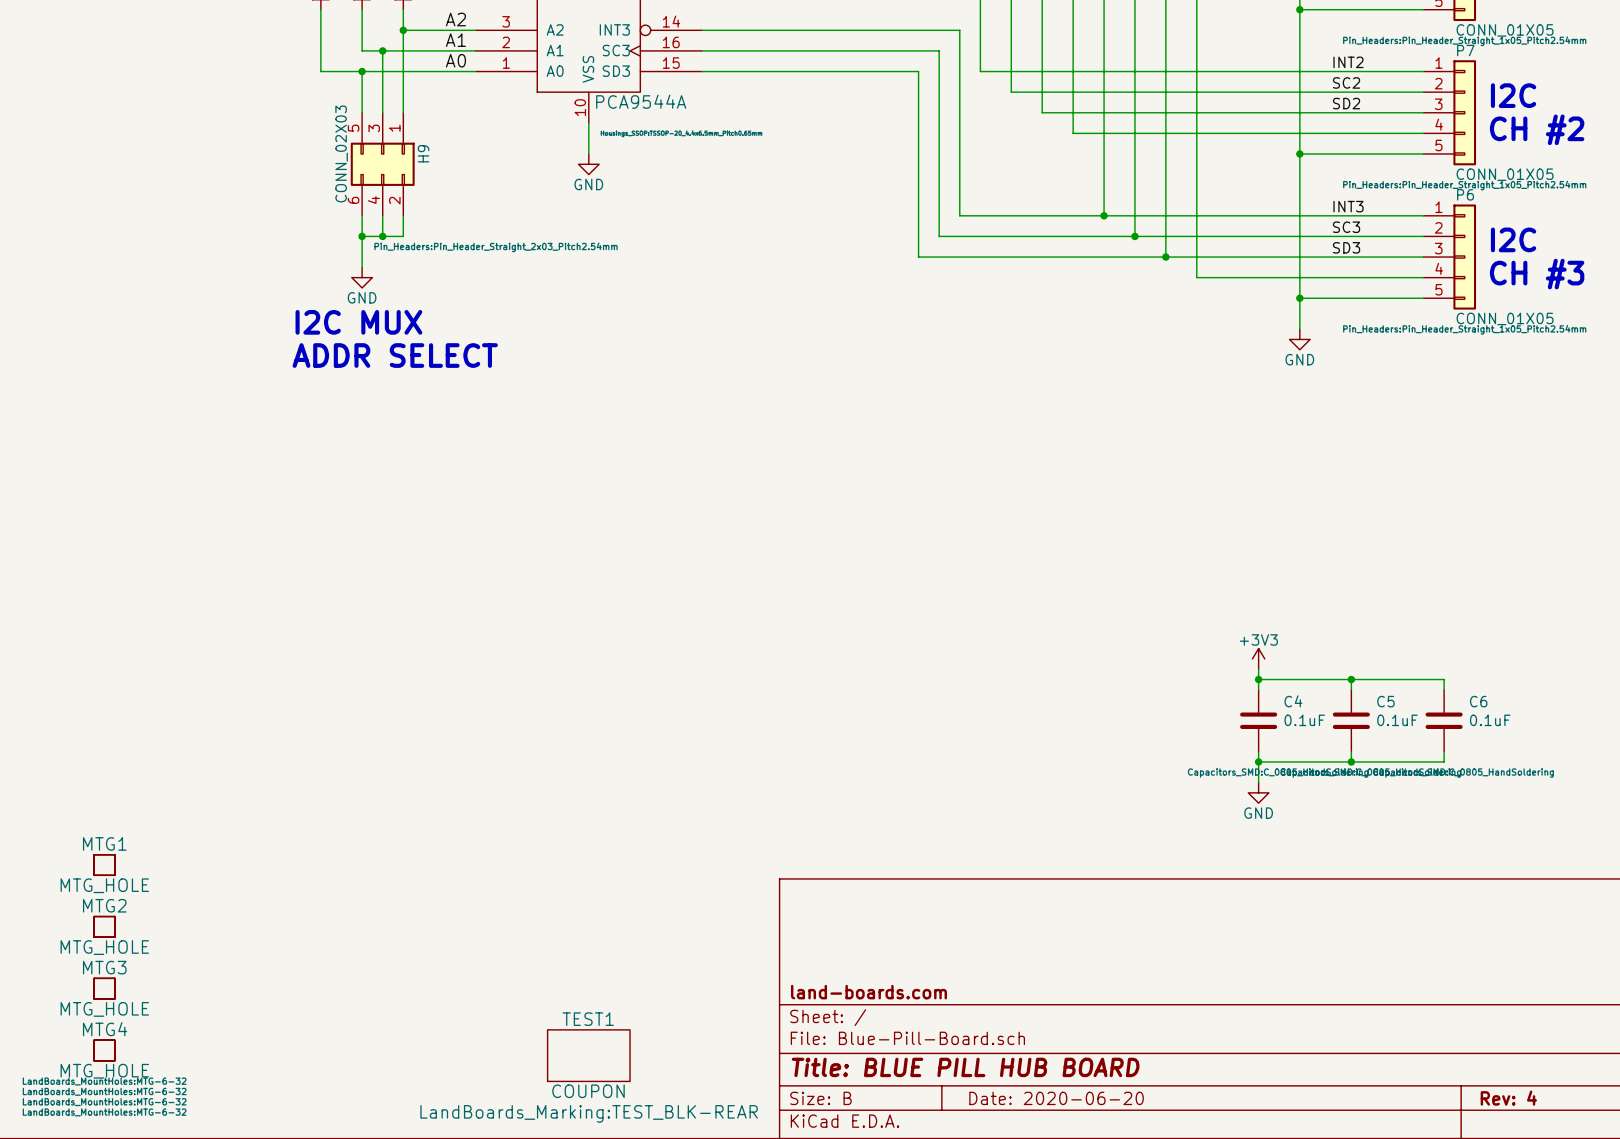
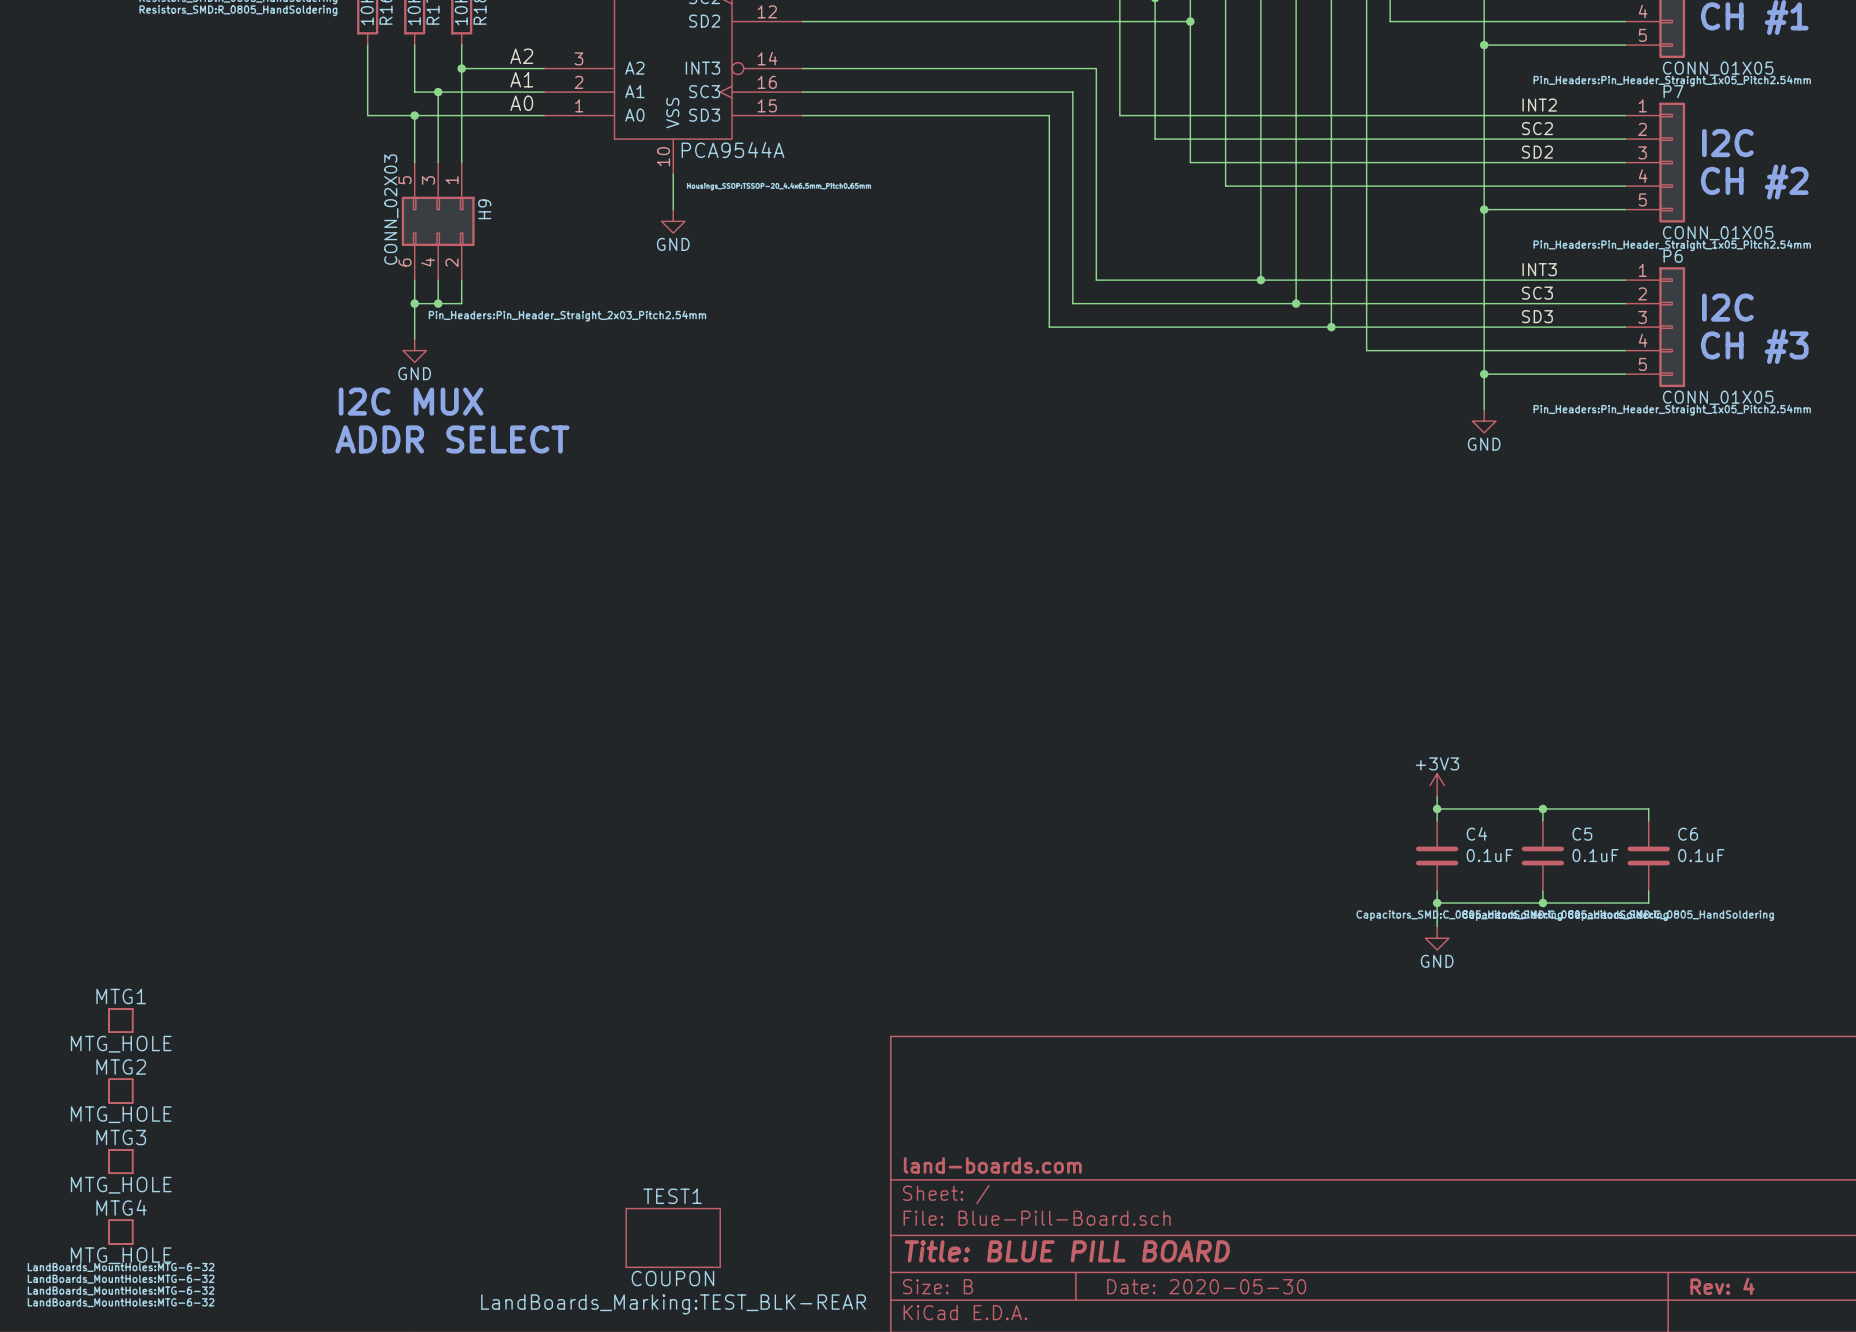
title block: Title: BLUE PILL HUB BOARD (965, 1067) -> Title: BLUE PILL BOARD (1067, 1251)
title block: Date: 2020-06-20 (1056, 1098) -> Date: 2020-05-30 (1206, 1286)

